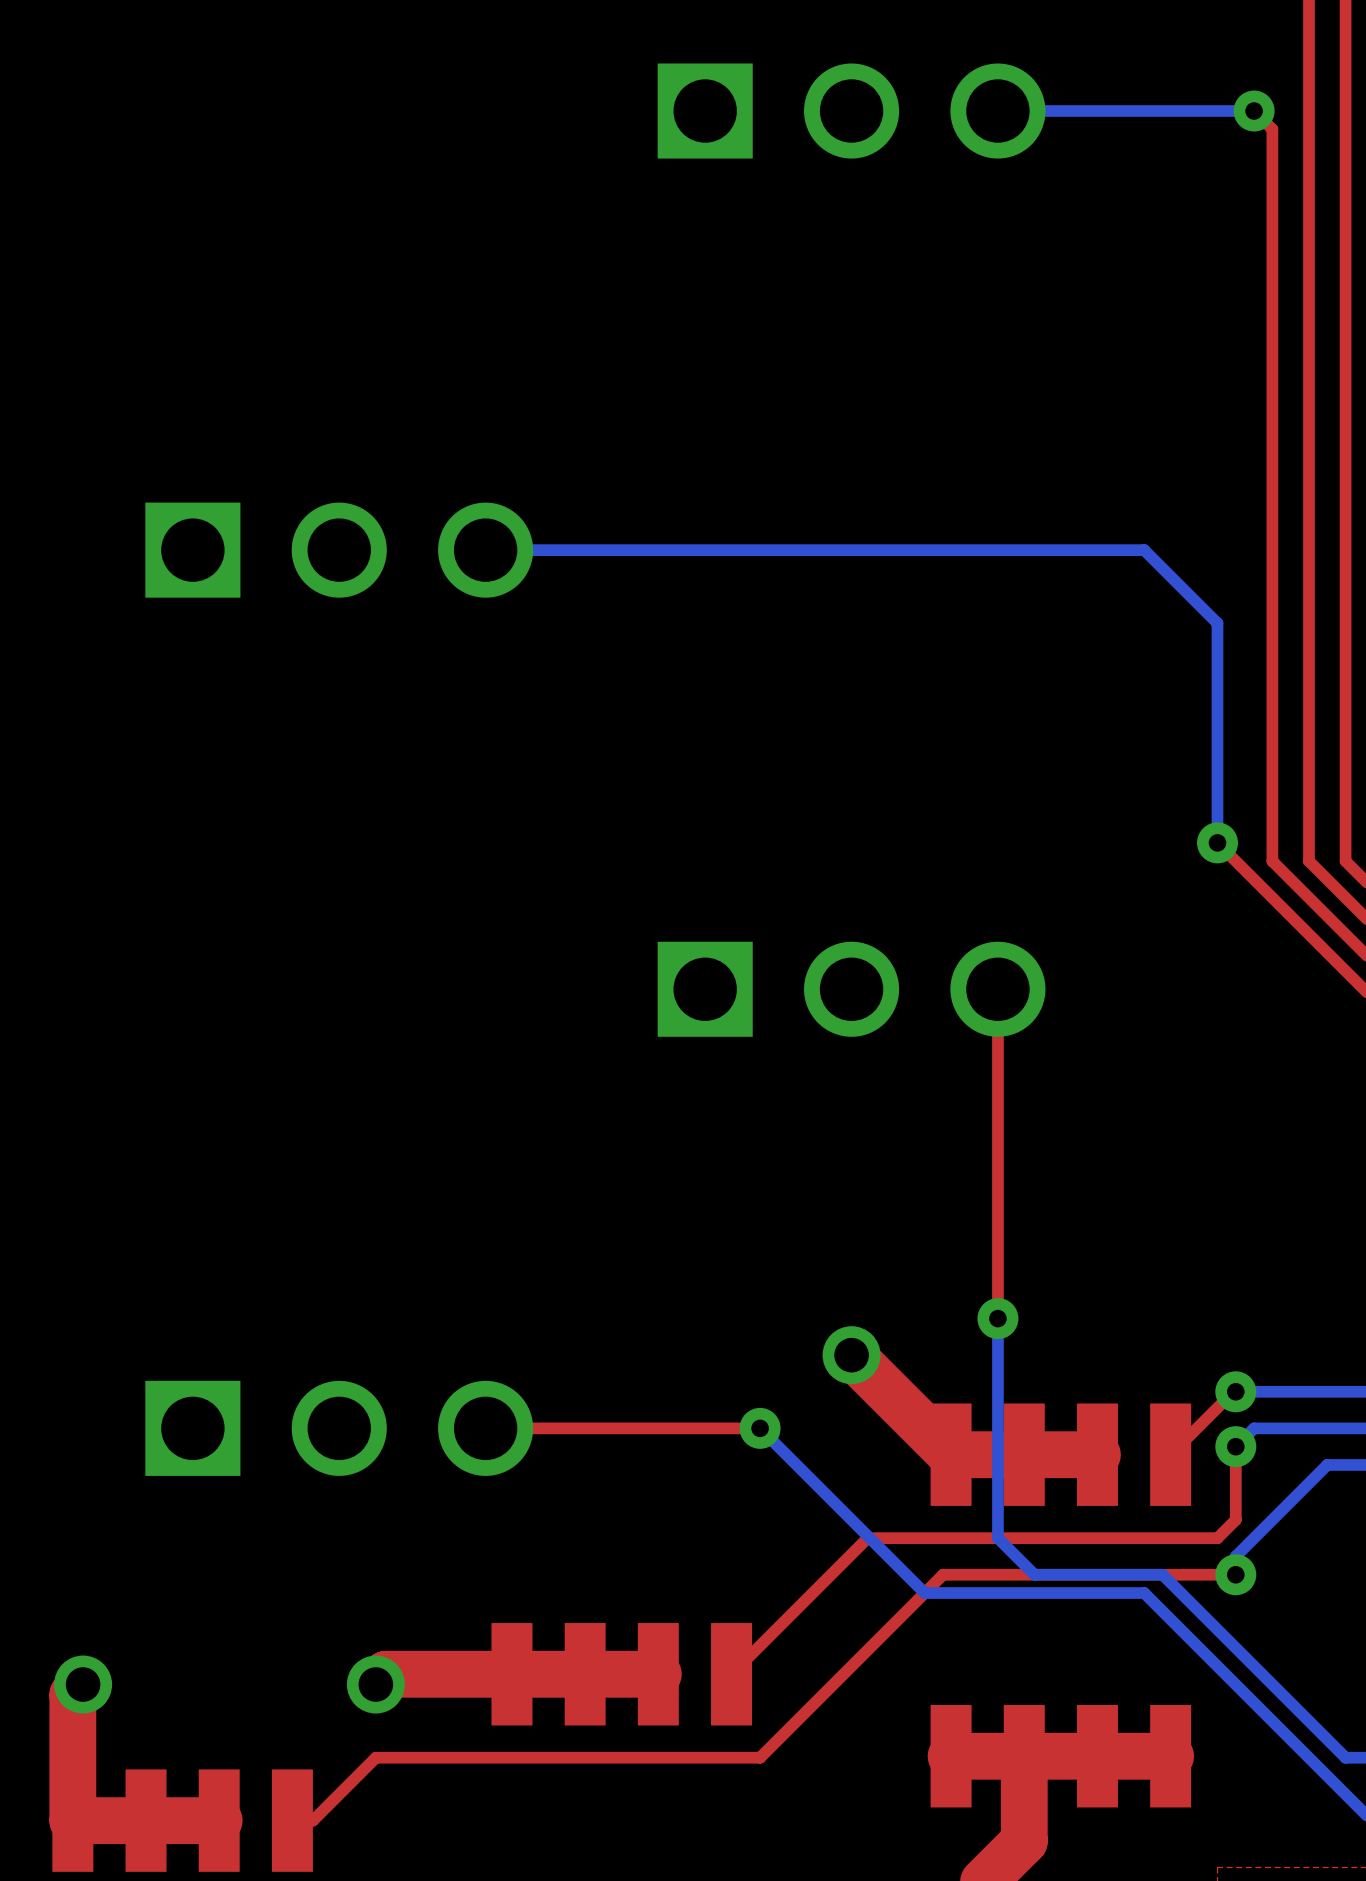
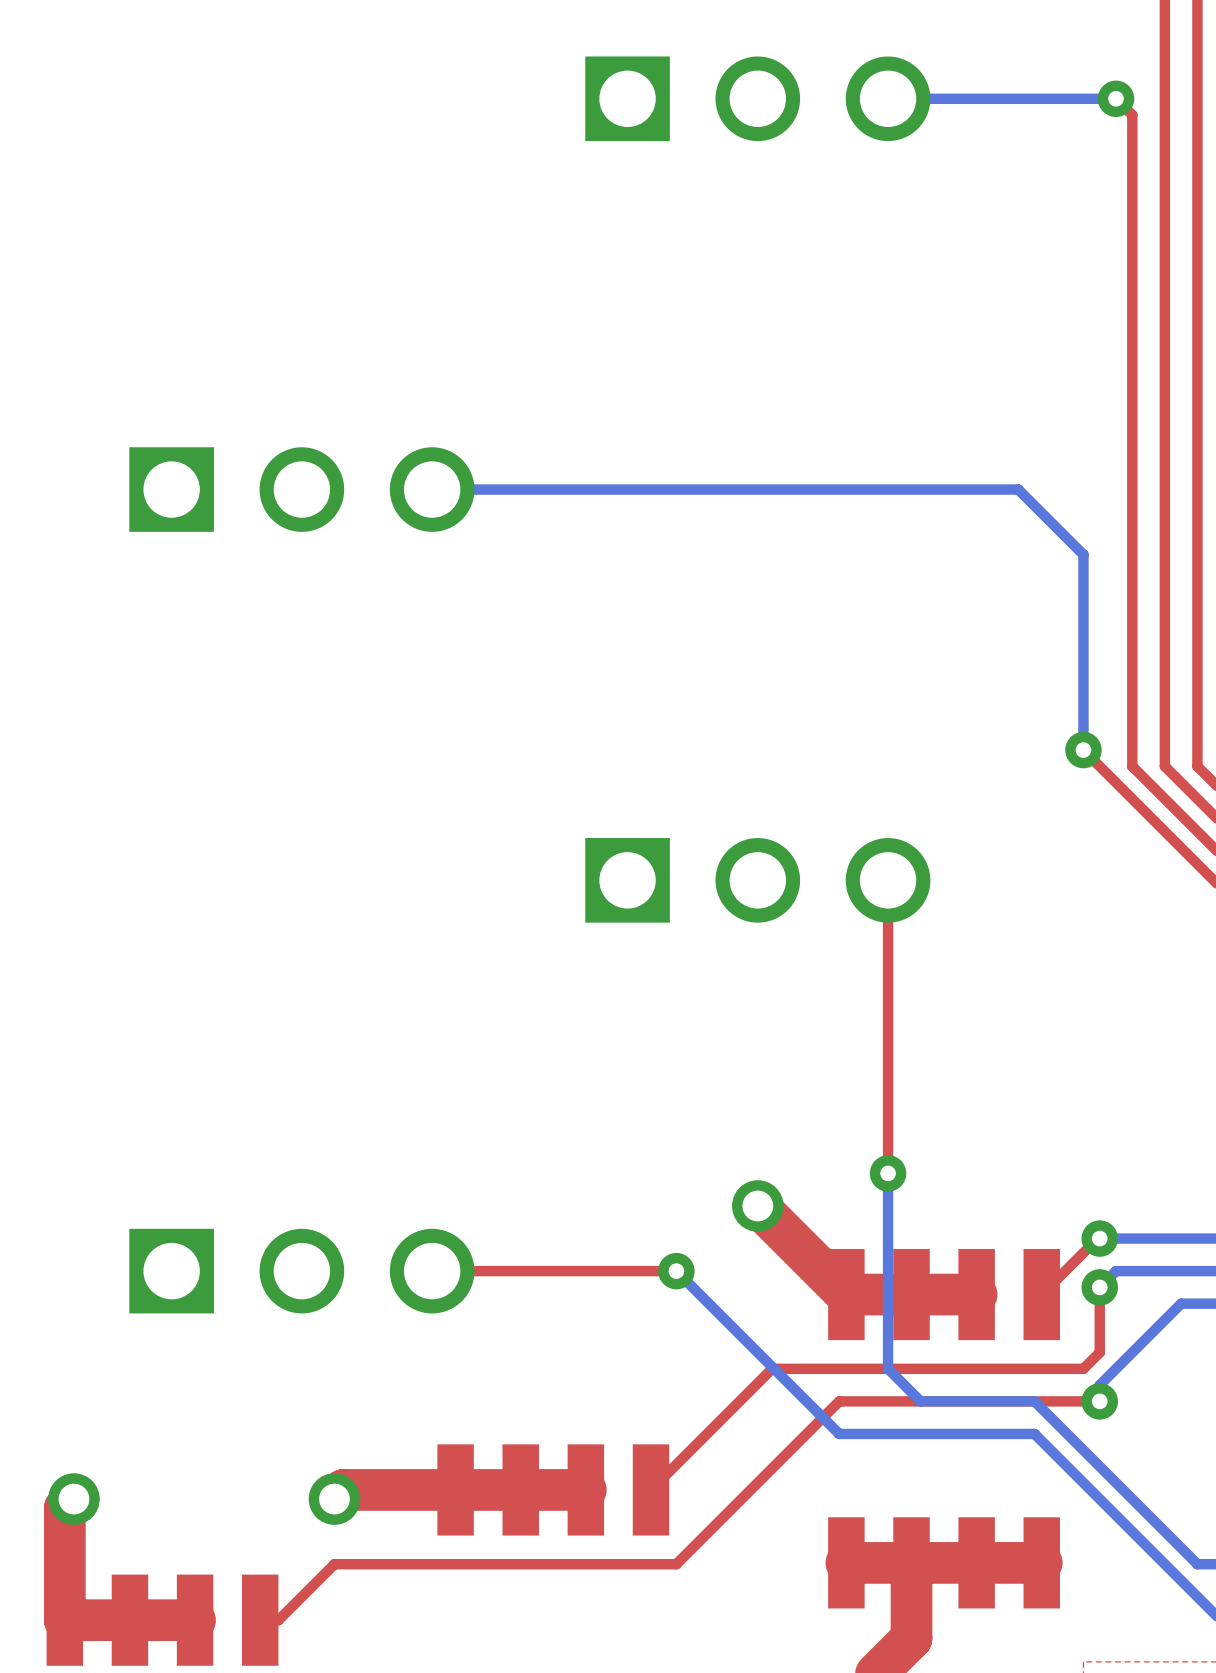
bottom track: (924, 1593) (1144, 1593) (1162, 1611) -> (822, 1417) (839, 1433) (1034, 1433)

